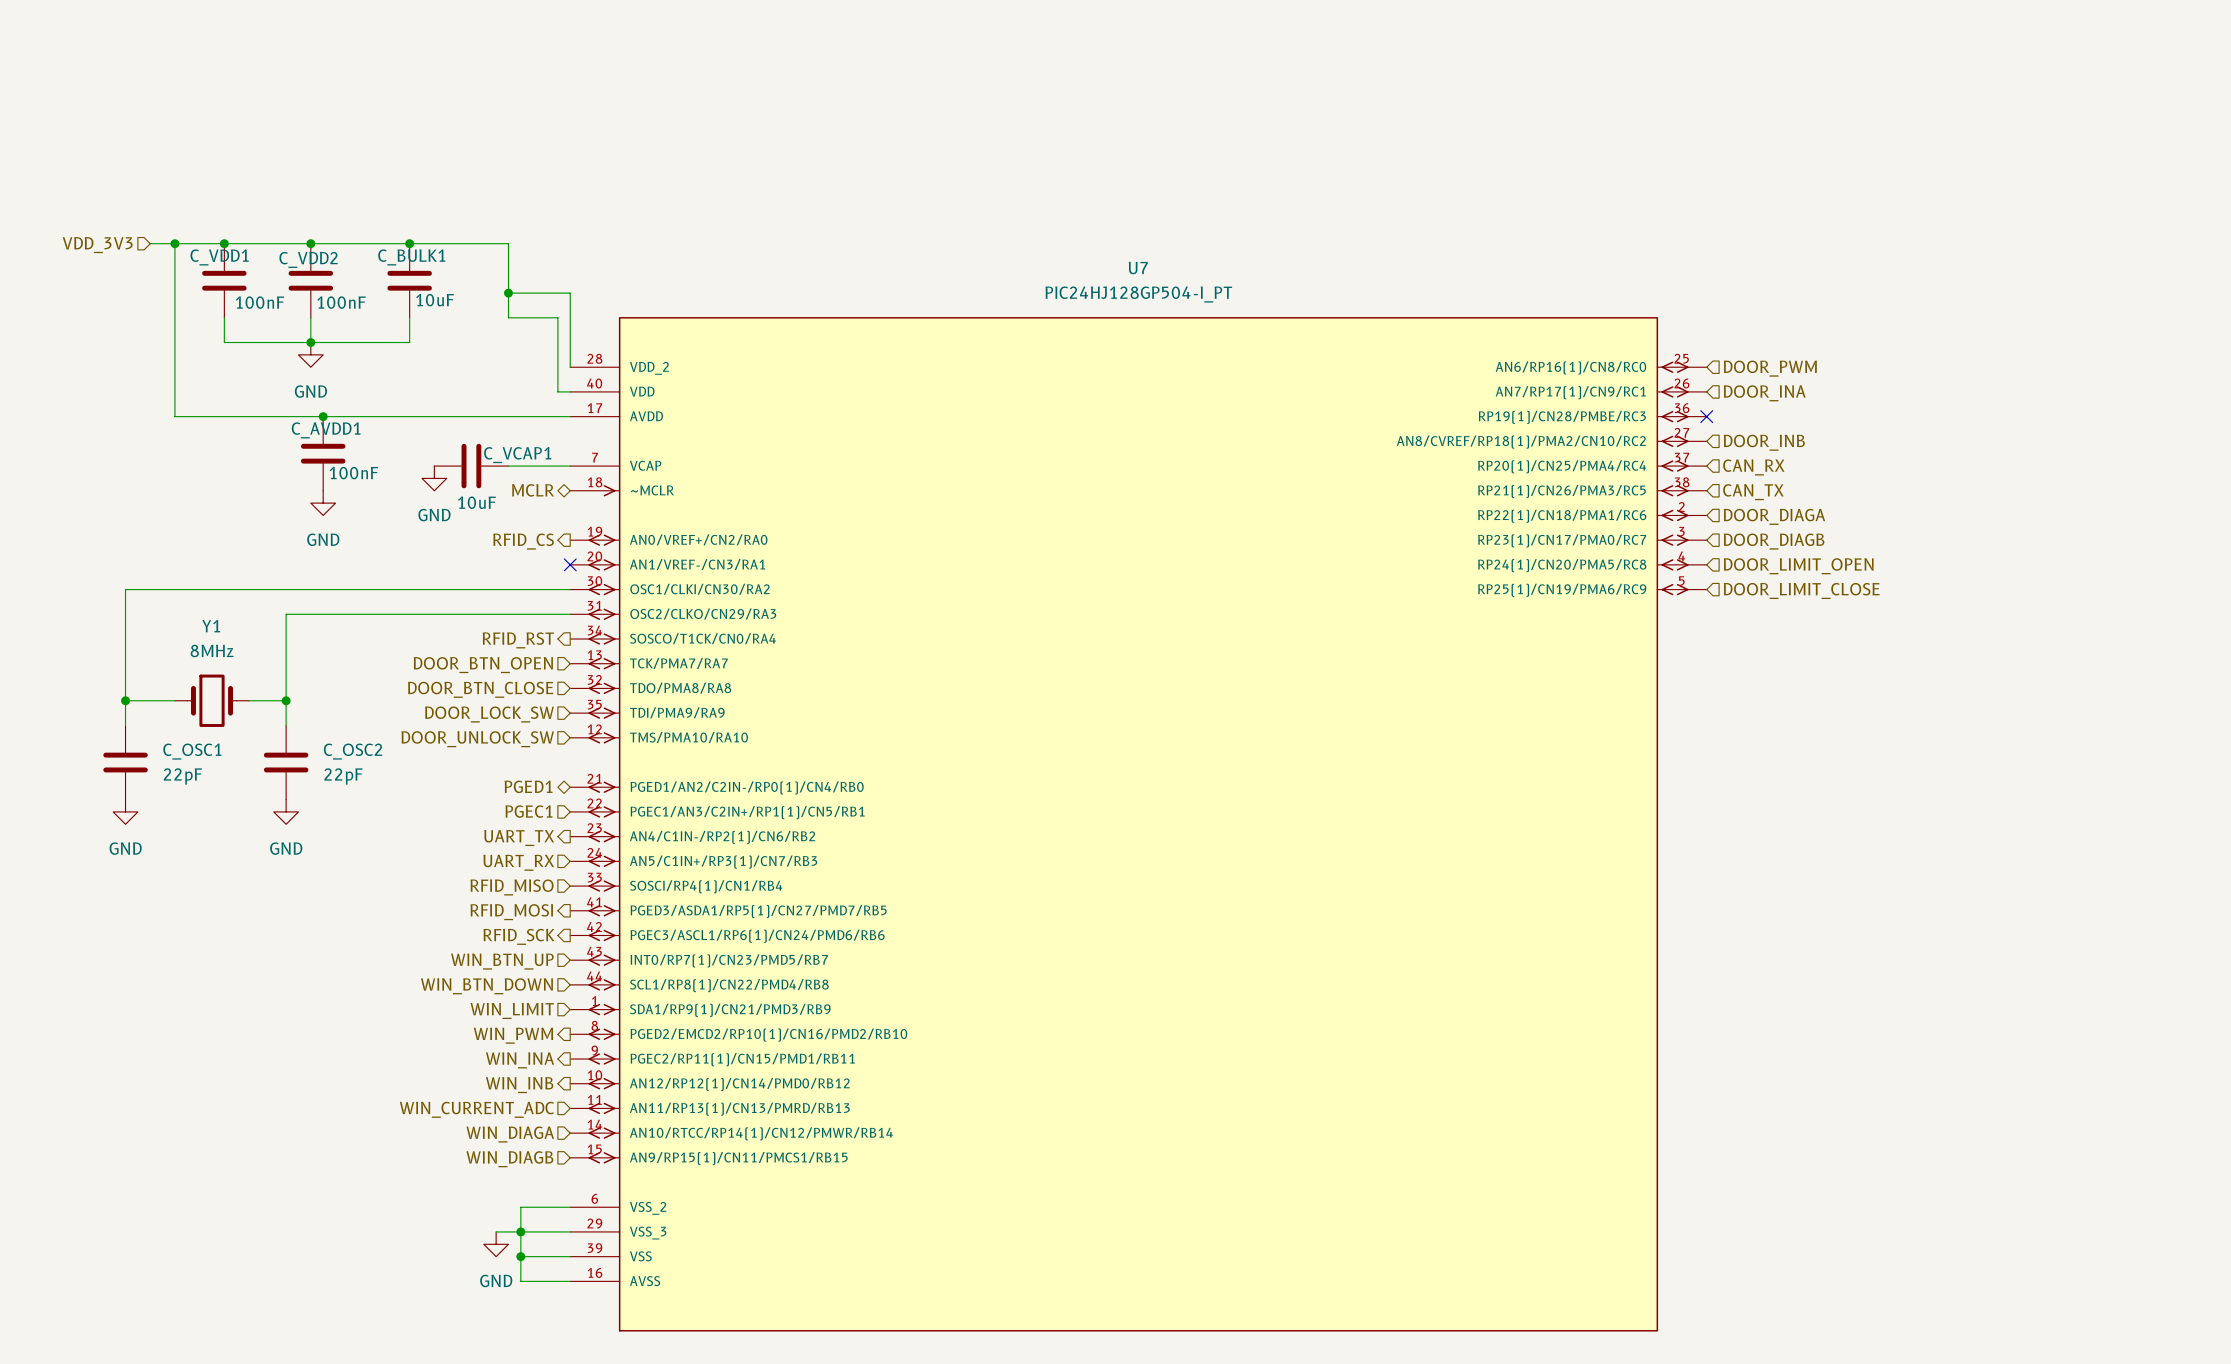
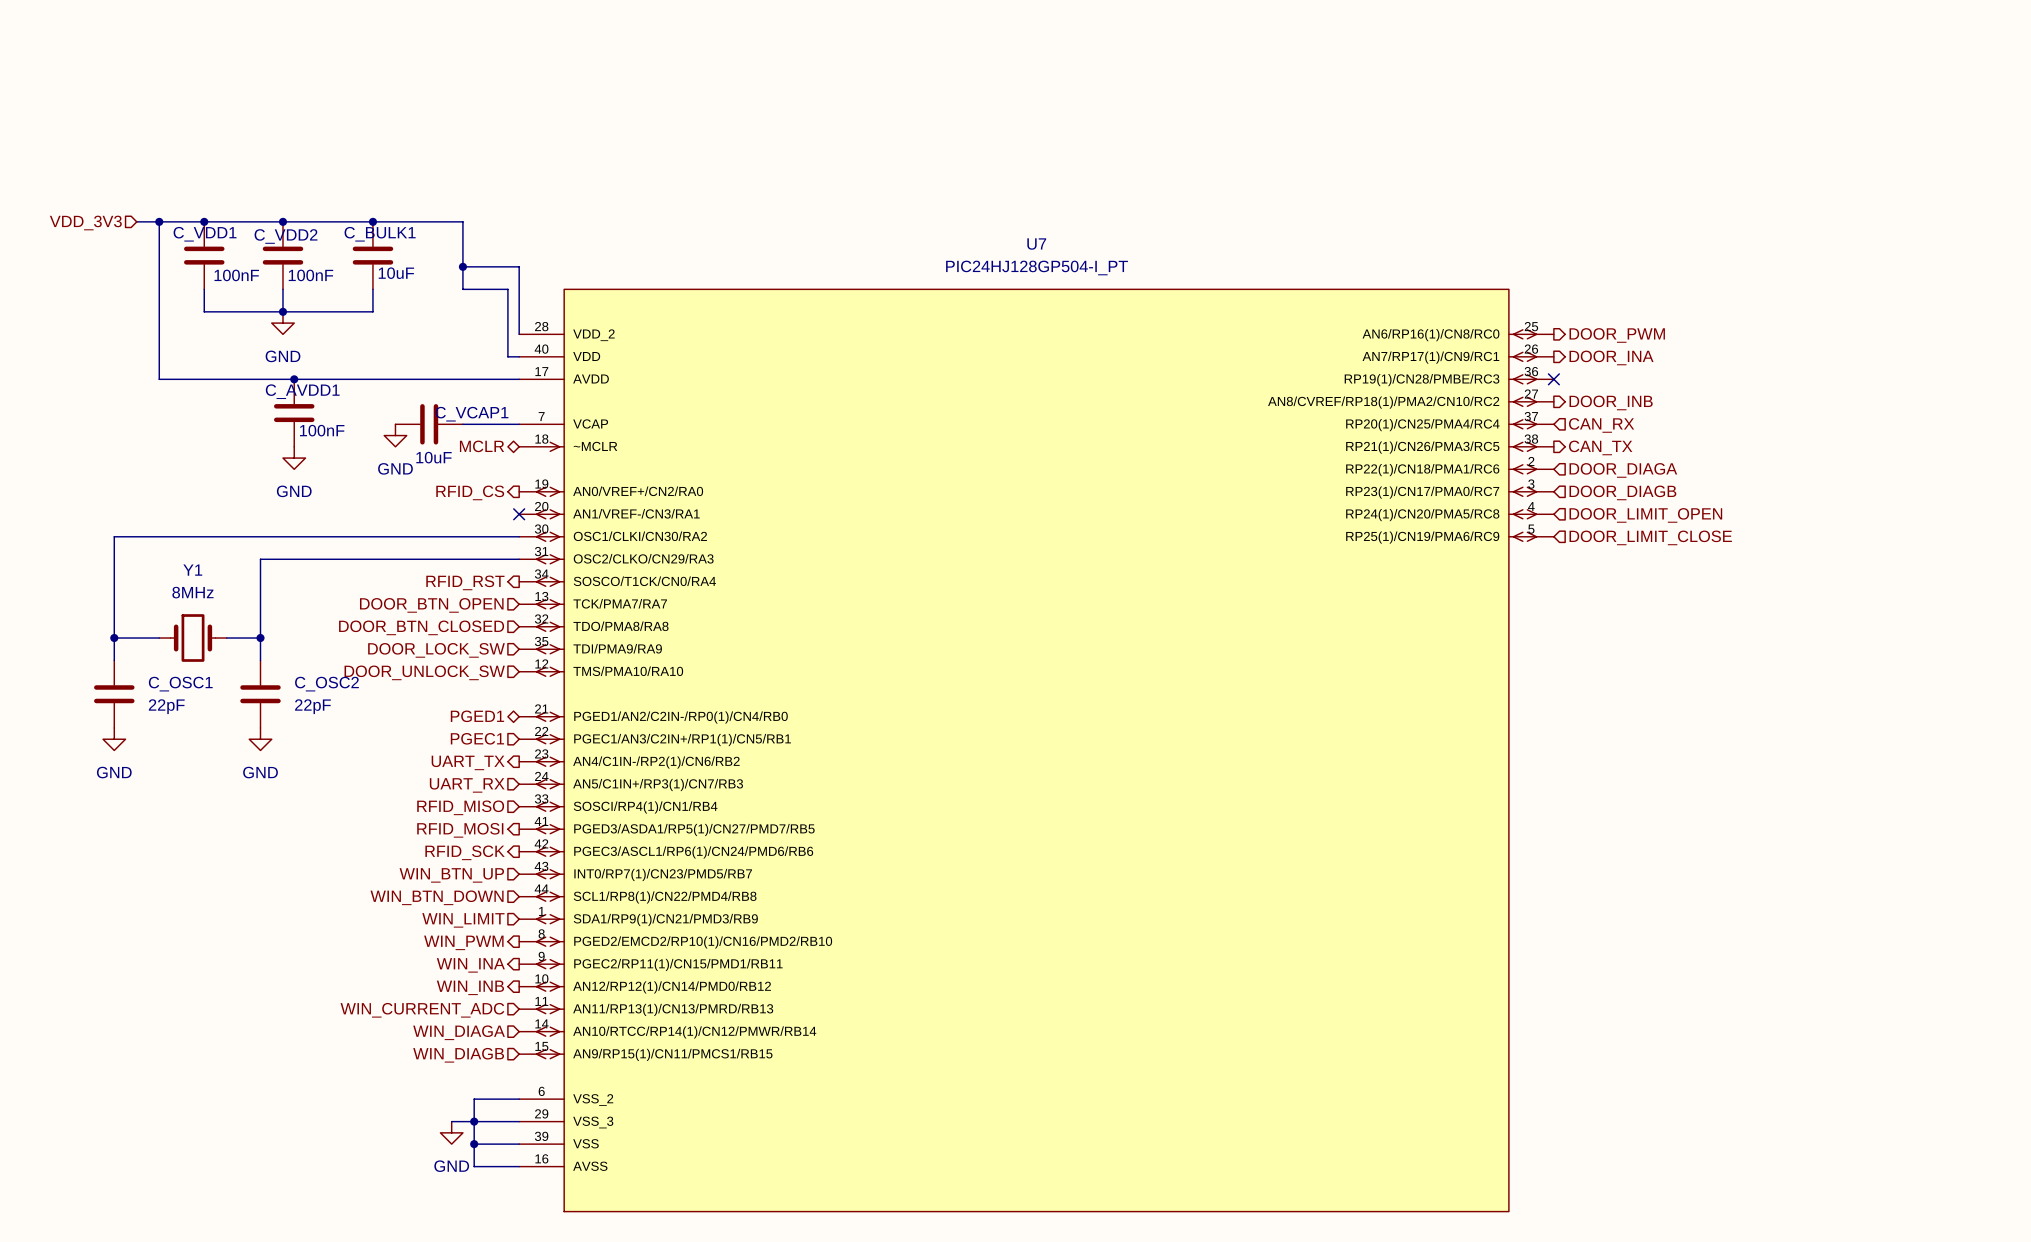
hierarchical label shape: input (1770, 368) -> output (1617, 335)
hierarchical label shape: input (1764, 393) -> output (1611, 357)
hierarchical label shape: input (1764, 442) -> output (1611, 402)
hierarchical label shape: input (1753, 492) -> output (1600, 447)
hierarchical label: DOOR_BTN_CLOSE (480, 689) -> DOOR_BTN_CLOSED (421, 627)

